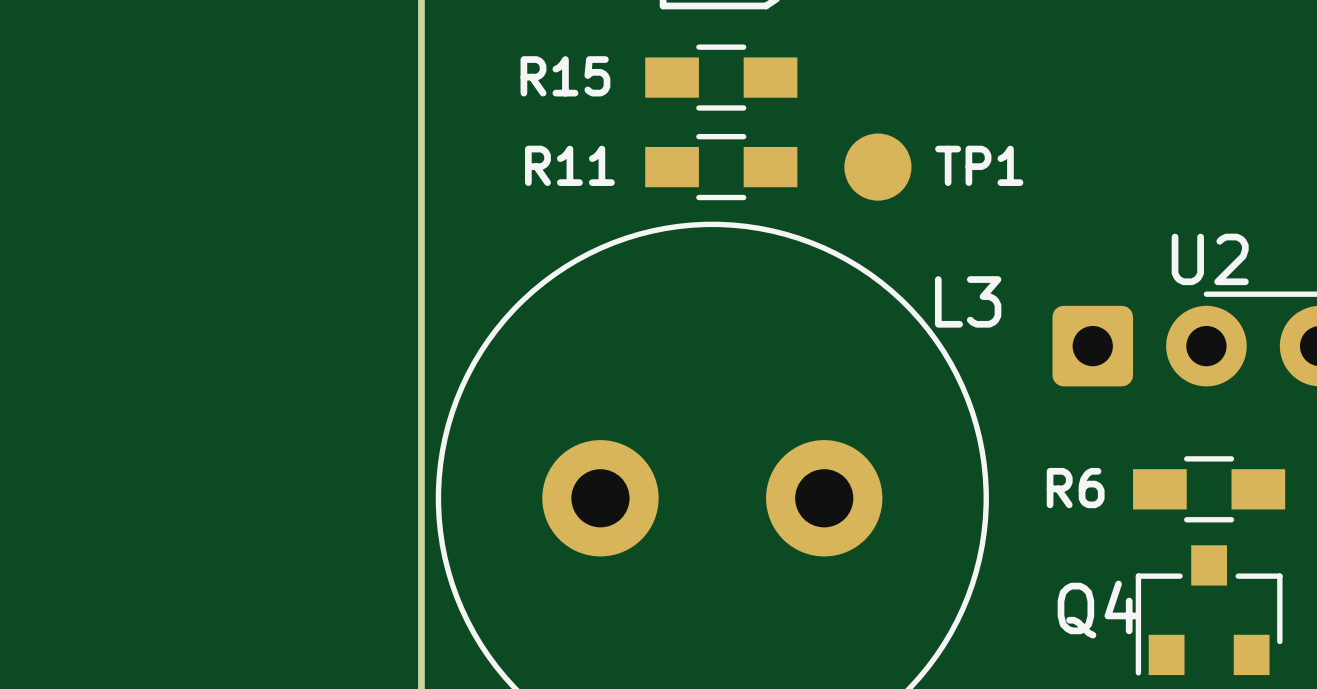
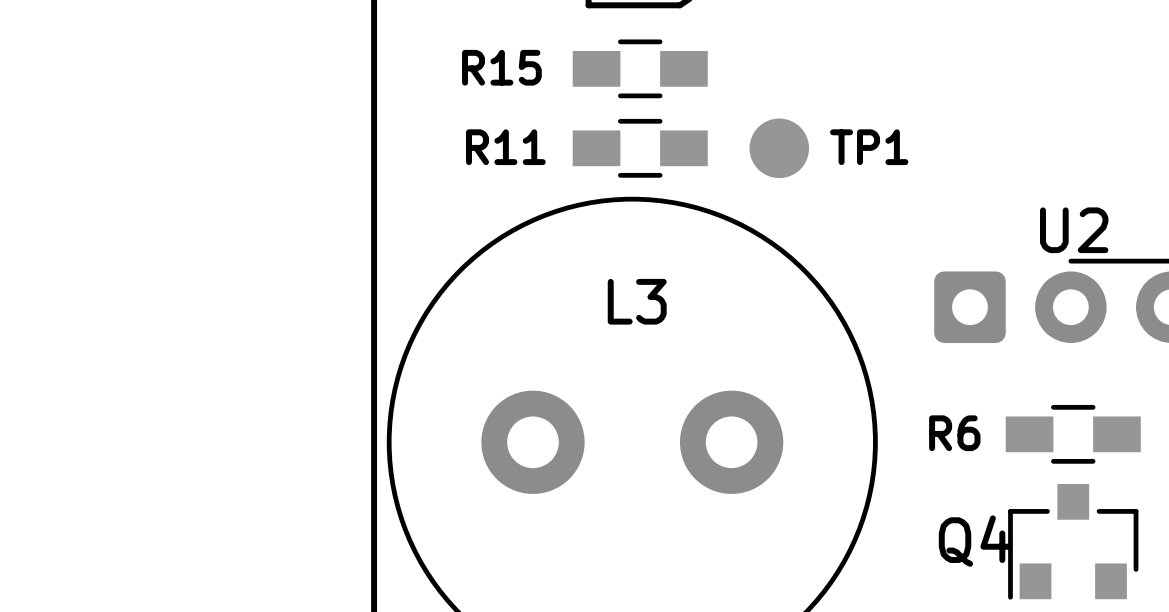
L3 name position: L3 (968, 301) -> L3 (637, 301)

